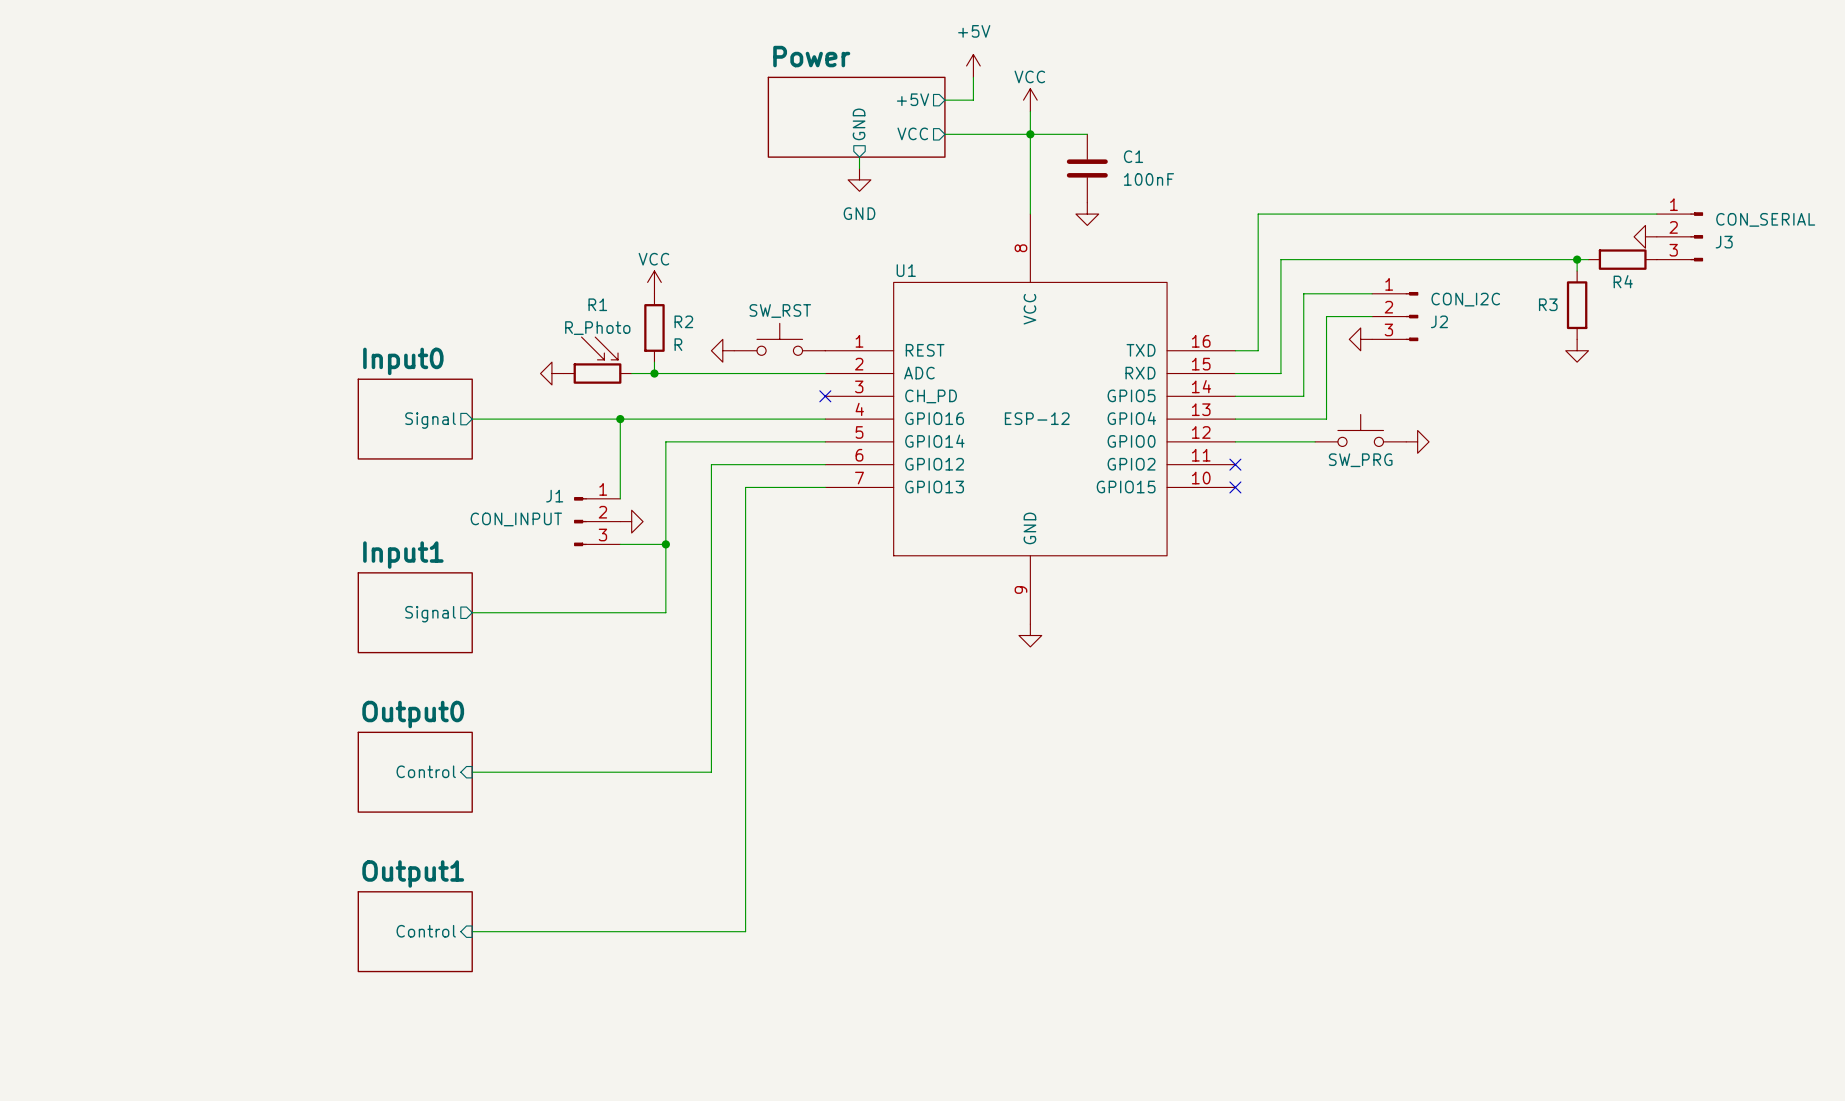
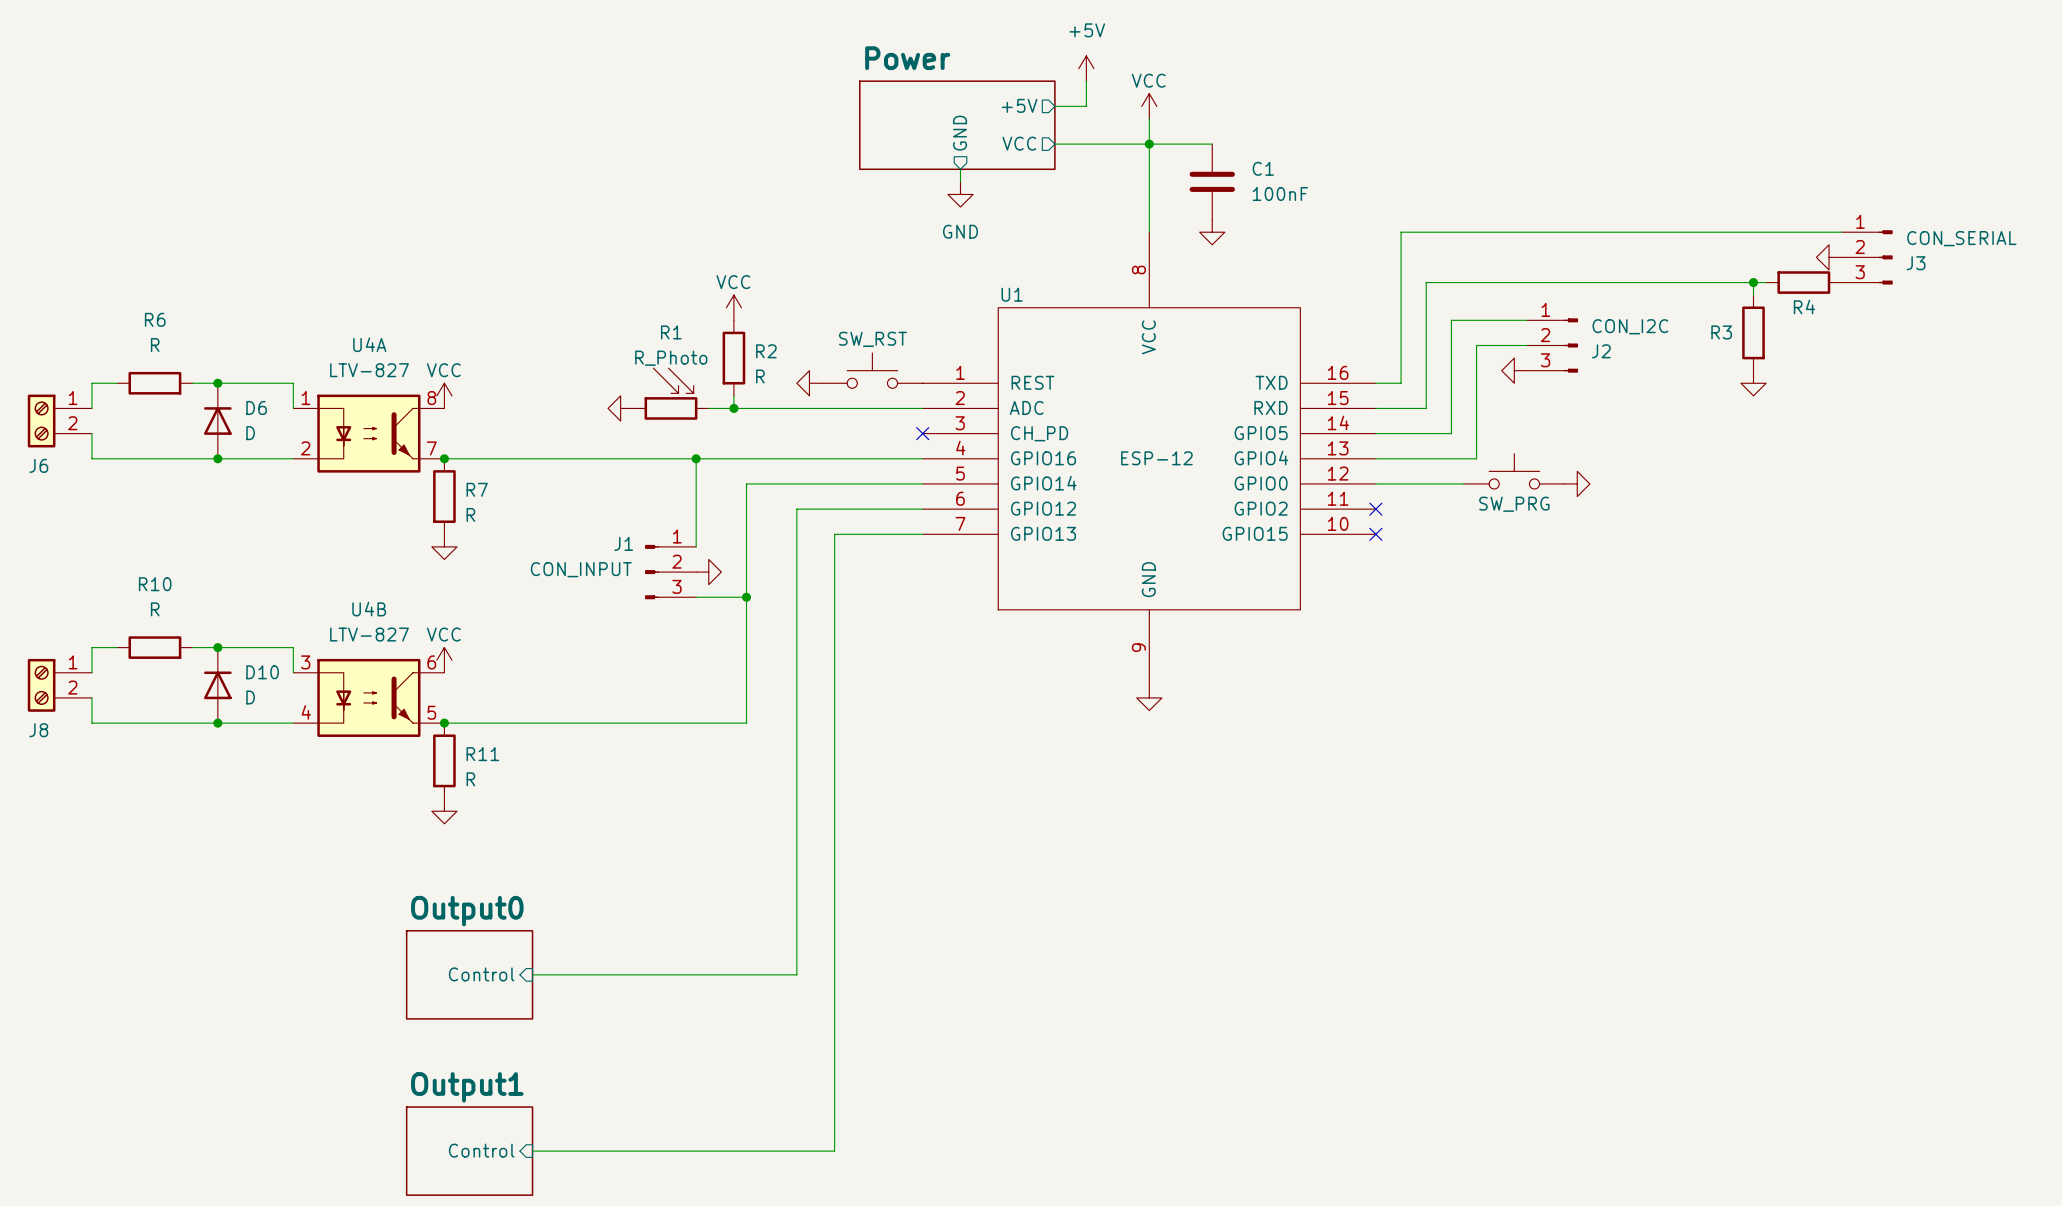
wire: none -> (117, 383) (91, 383) (91, 408)
R6: none -> R (154, 383)
wire: none -> (192, 383) (293, 383) (293, 408)
junction: none -> (217, 383)
power symbol: none -> VCC (444, 395)
J6: none -> (59, 421)
D6: none -> D (217, 421)
wire: none -> (91, 433) (91, 458) (293, 458)
U4A: none -> LTV-827 (368, 433)
junction: none -> (217, 458)
wire: none -> (444, 458) (532, 458)
junction: none -> (444, 458)
sheet Input0: (415, 419) -> none
sheet pin: Signal (430, 420) -> none
R7: none -> R (444, 496)
power symbol: none -> (444, 546)
wire: none -> (117, 647) (91, 647) (91, 672)
R10: none -> R (154, 647)
wire: none -> (192, 647) (293, 647) (293, 672)
junction: none -> (217, 647)
power symbol: none -> VCC (444, 660)
sheet Input1: (415, 612) -> none
wire: (472, 612) (665, 612) -> (444, 723) (746, 723) (746, 672)
sheet pin: Signal (430, 614) -> none
J8: none -> (59, 685)
D10: none -> D (217, 685)
wire: none -> (91, 697) (91, 723) (293, 723)
U4B: none -> LTV-827 (368, 697)
junction: none -> (217, 723)
junction: none -> (444, 723)
R11: none -> R (444, 760)
power symbol: none -> (444, 811)
sheet pin: Control (426, 771) -> none
sheet Output0 position: (415, 772) -> (469, 974)
wire: (472, 772) (711, 772) -> (532, 974) (796, 974) (796, 848)
sheet Output1 position: (415, 931) -> (469, 1151)
sheet pin position: Control (426, 931) -> Control (481, 974)
wire: (472, 931) (745, 931) -> (532, 1151) (834, 1151) (834, 1025)
sheet pin: none -> Control (481, 1150)

